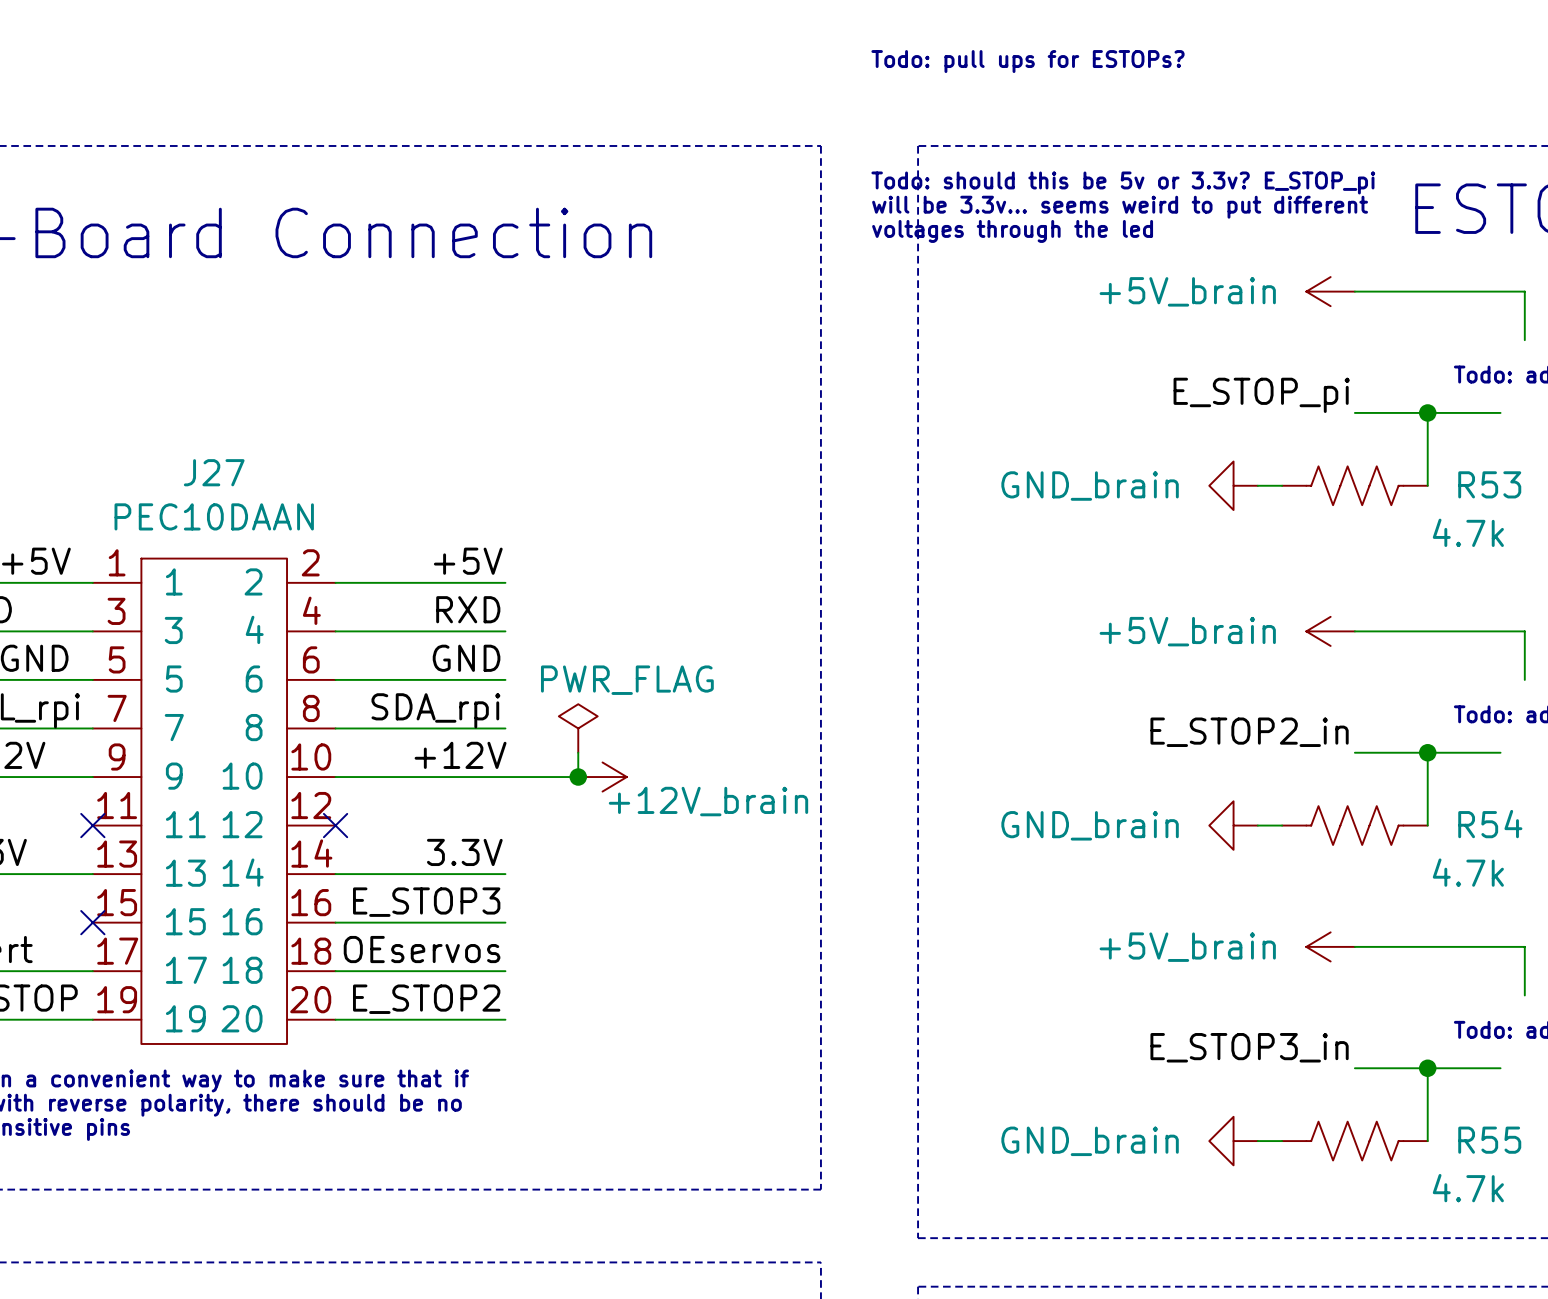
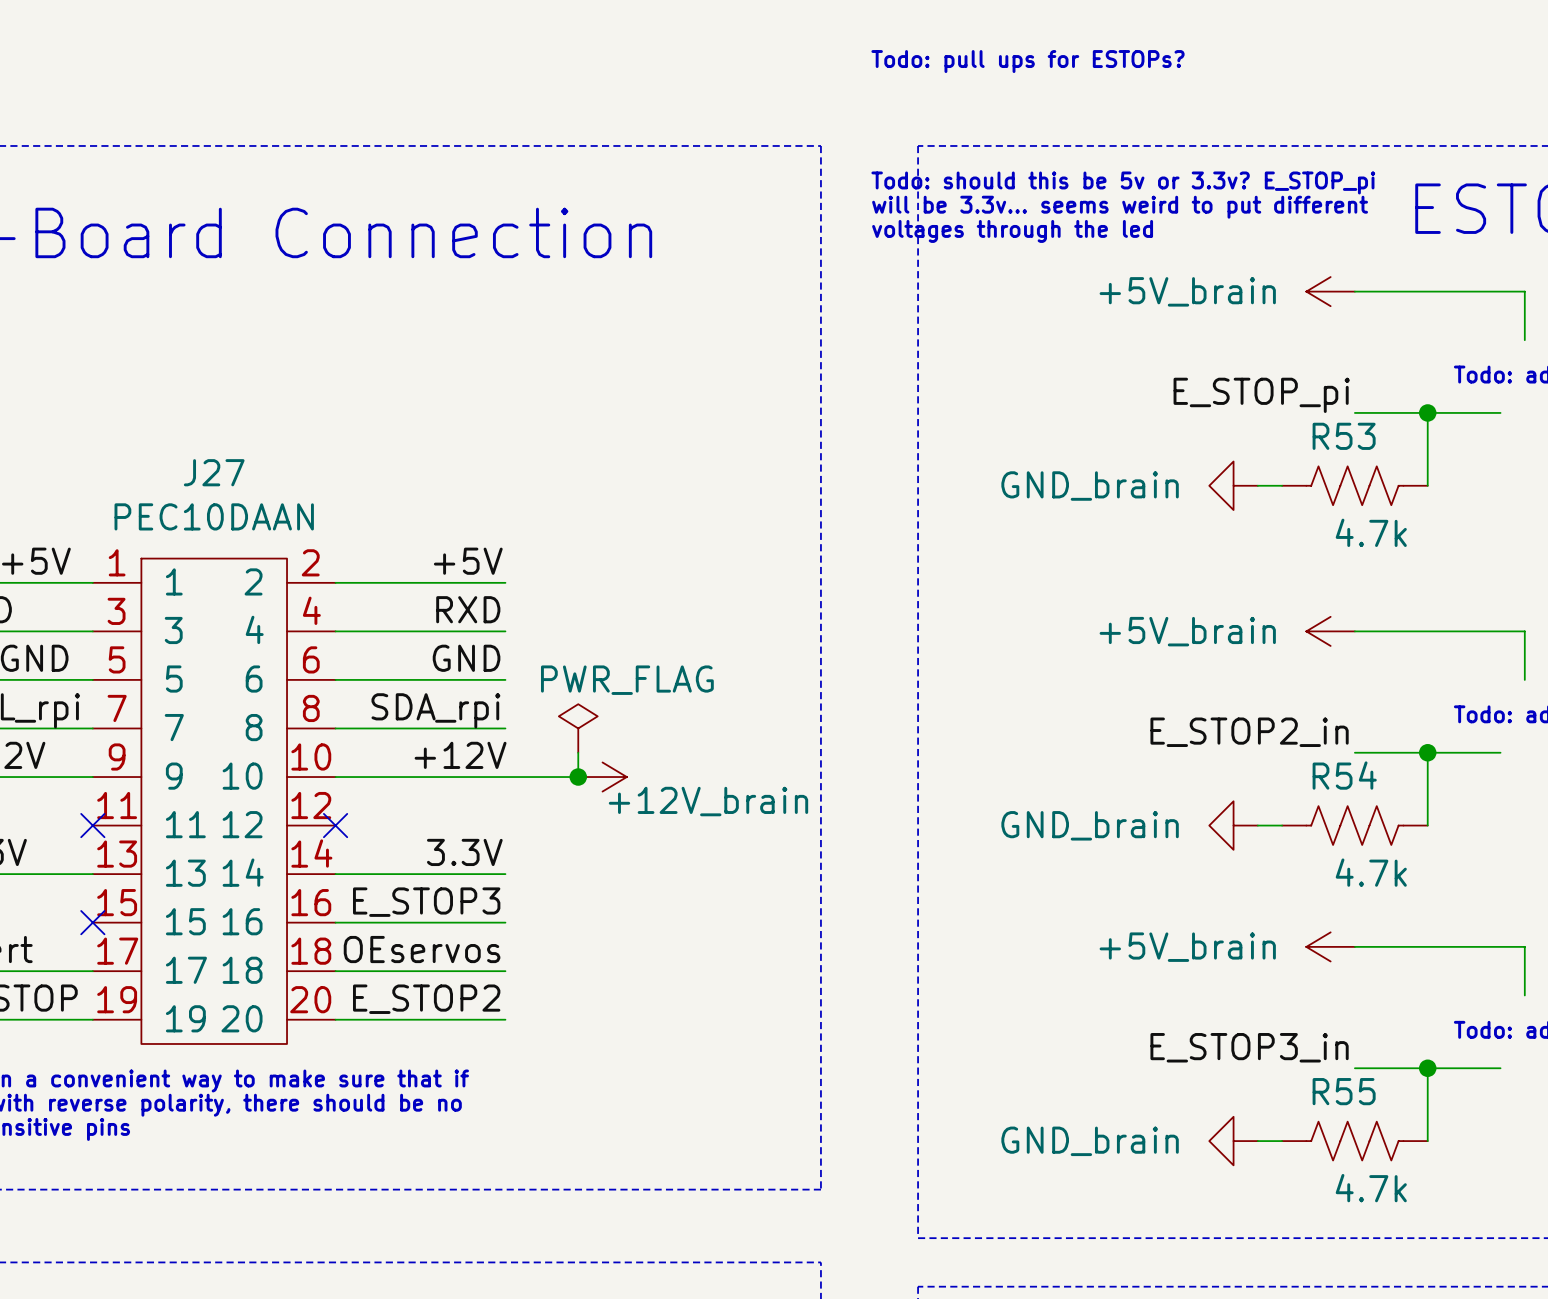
R53 name position: R53 (1489, 484) -> R53 (1344, 436)
R53 value position: 4.7k (1468, 532) -> 4.7k (1371, 532)
R54 name position: R54 (1490, 824) -> R54 (1344, 775)
R54 value position: 4.7k (1468, 872) -> 4.7k (1371, 872)
R55 name position: R55 (1489, 1140) -> R55 (1344, 1091)
R55 value position: 4.7k (1468, 1188) -> 4.7k (1371, 1188)

